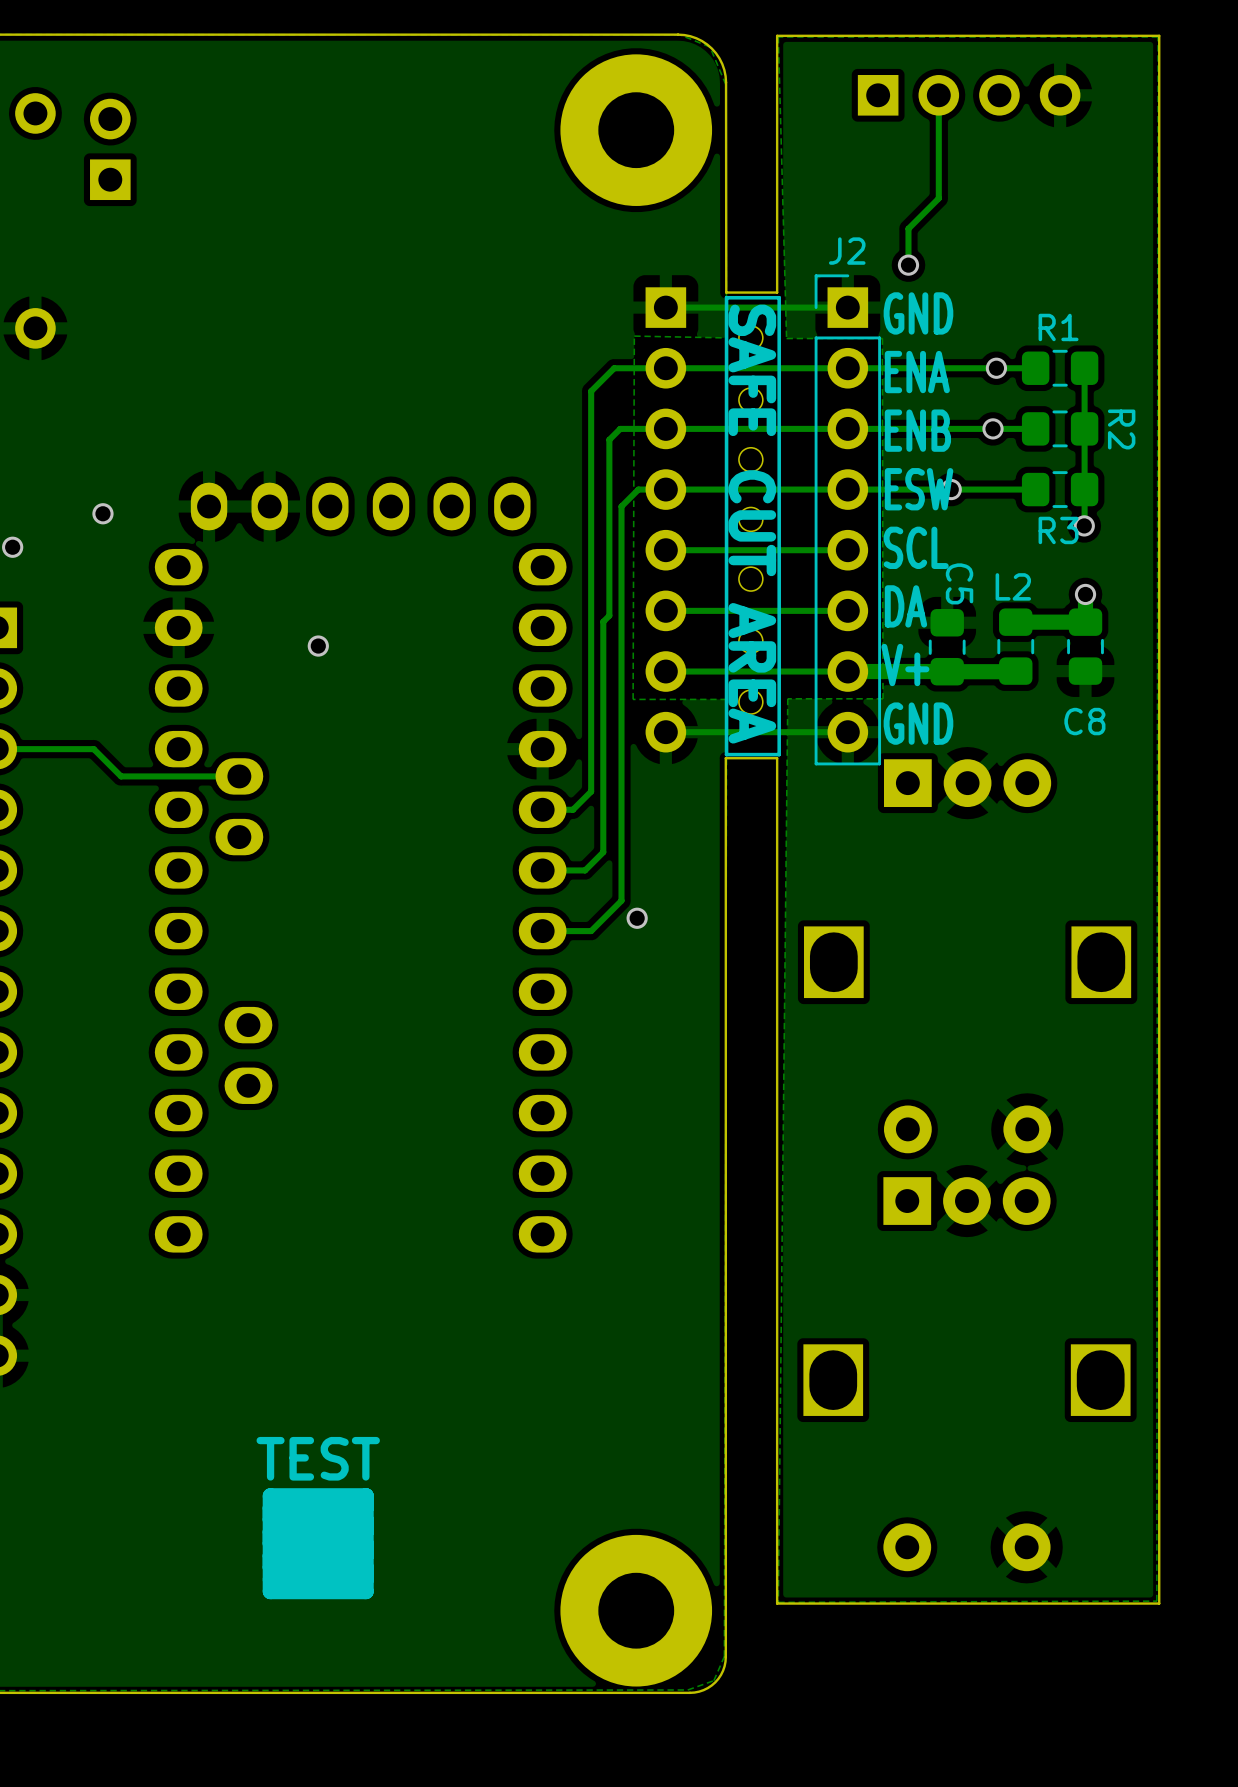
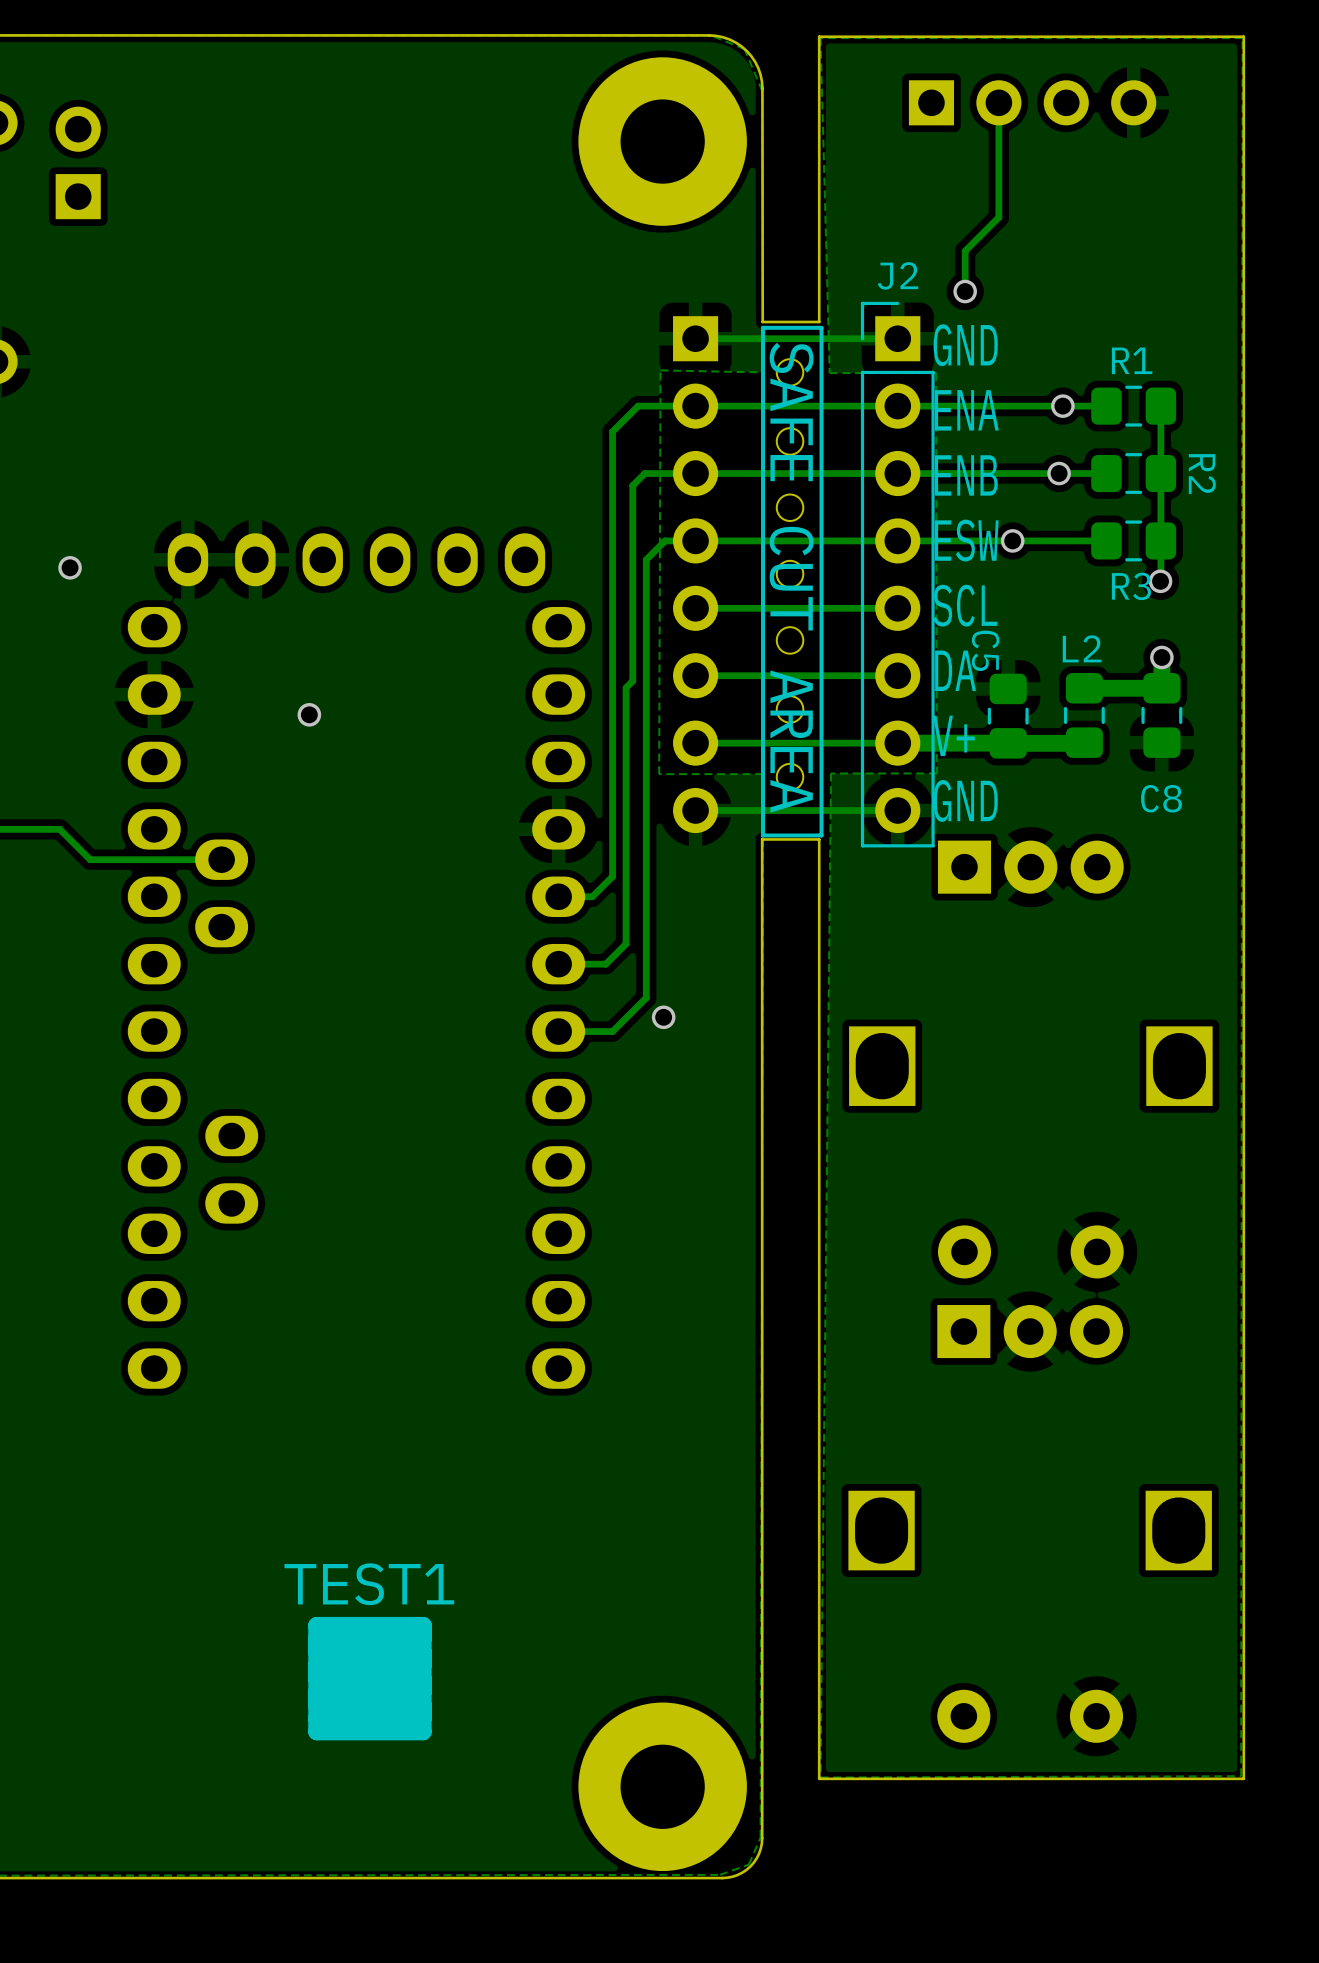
C5 name position: C5 (959, 583) -> C5 (985, 650)
TEST1: none -> (369, 1678)
TEST: (318, 1543) -> none

